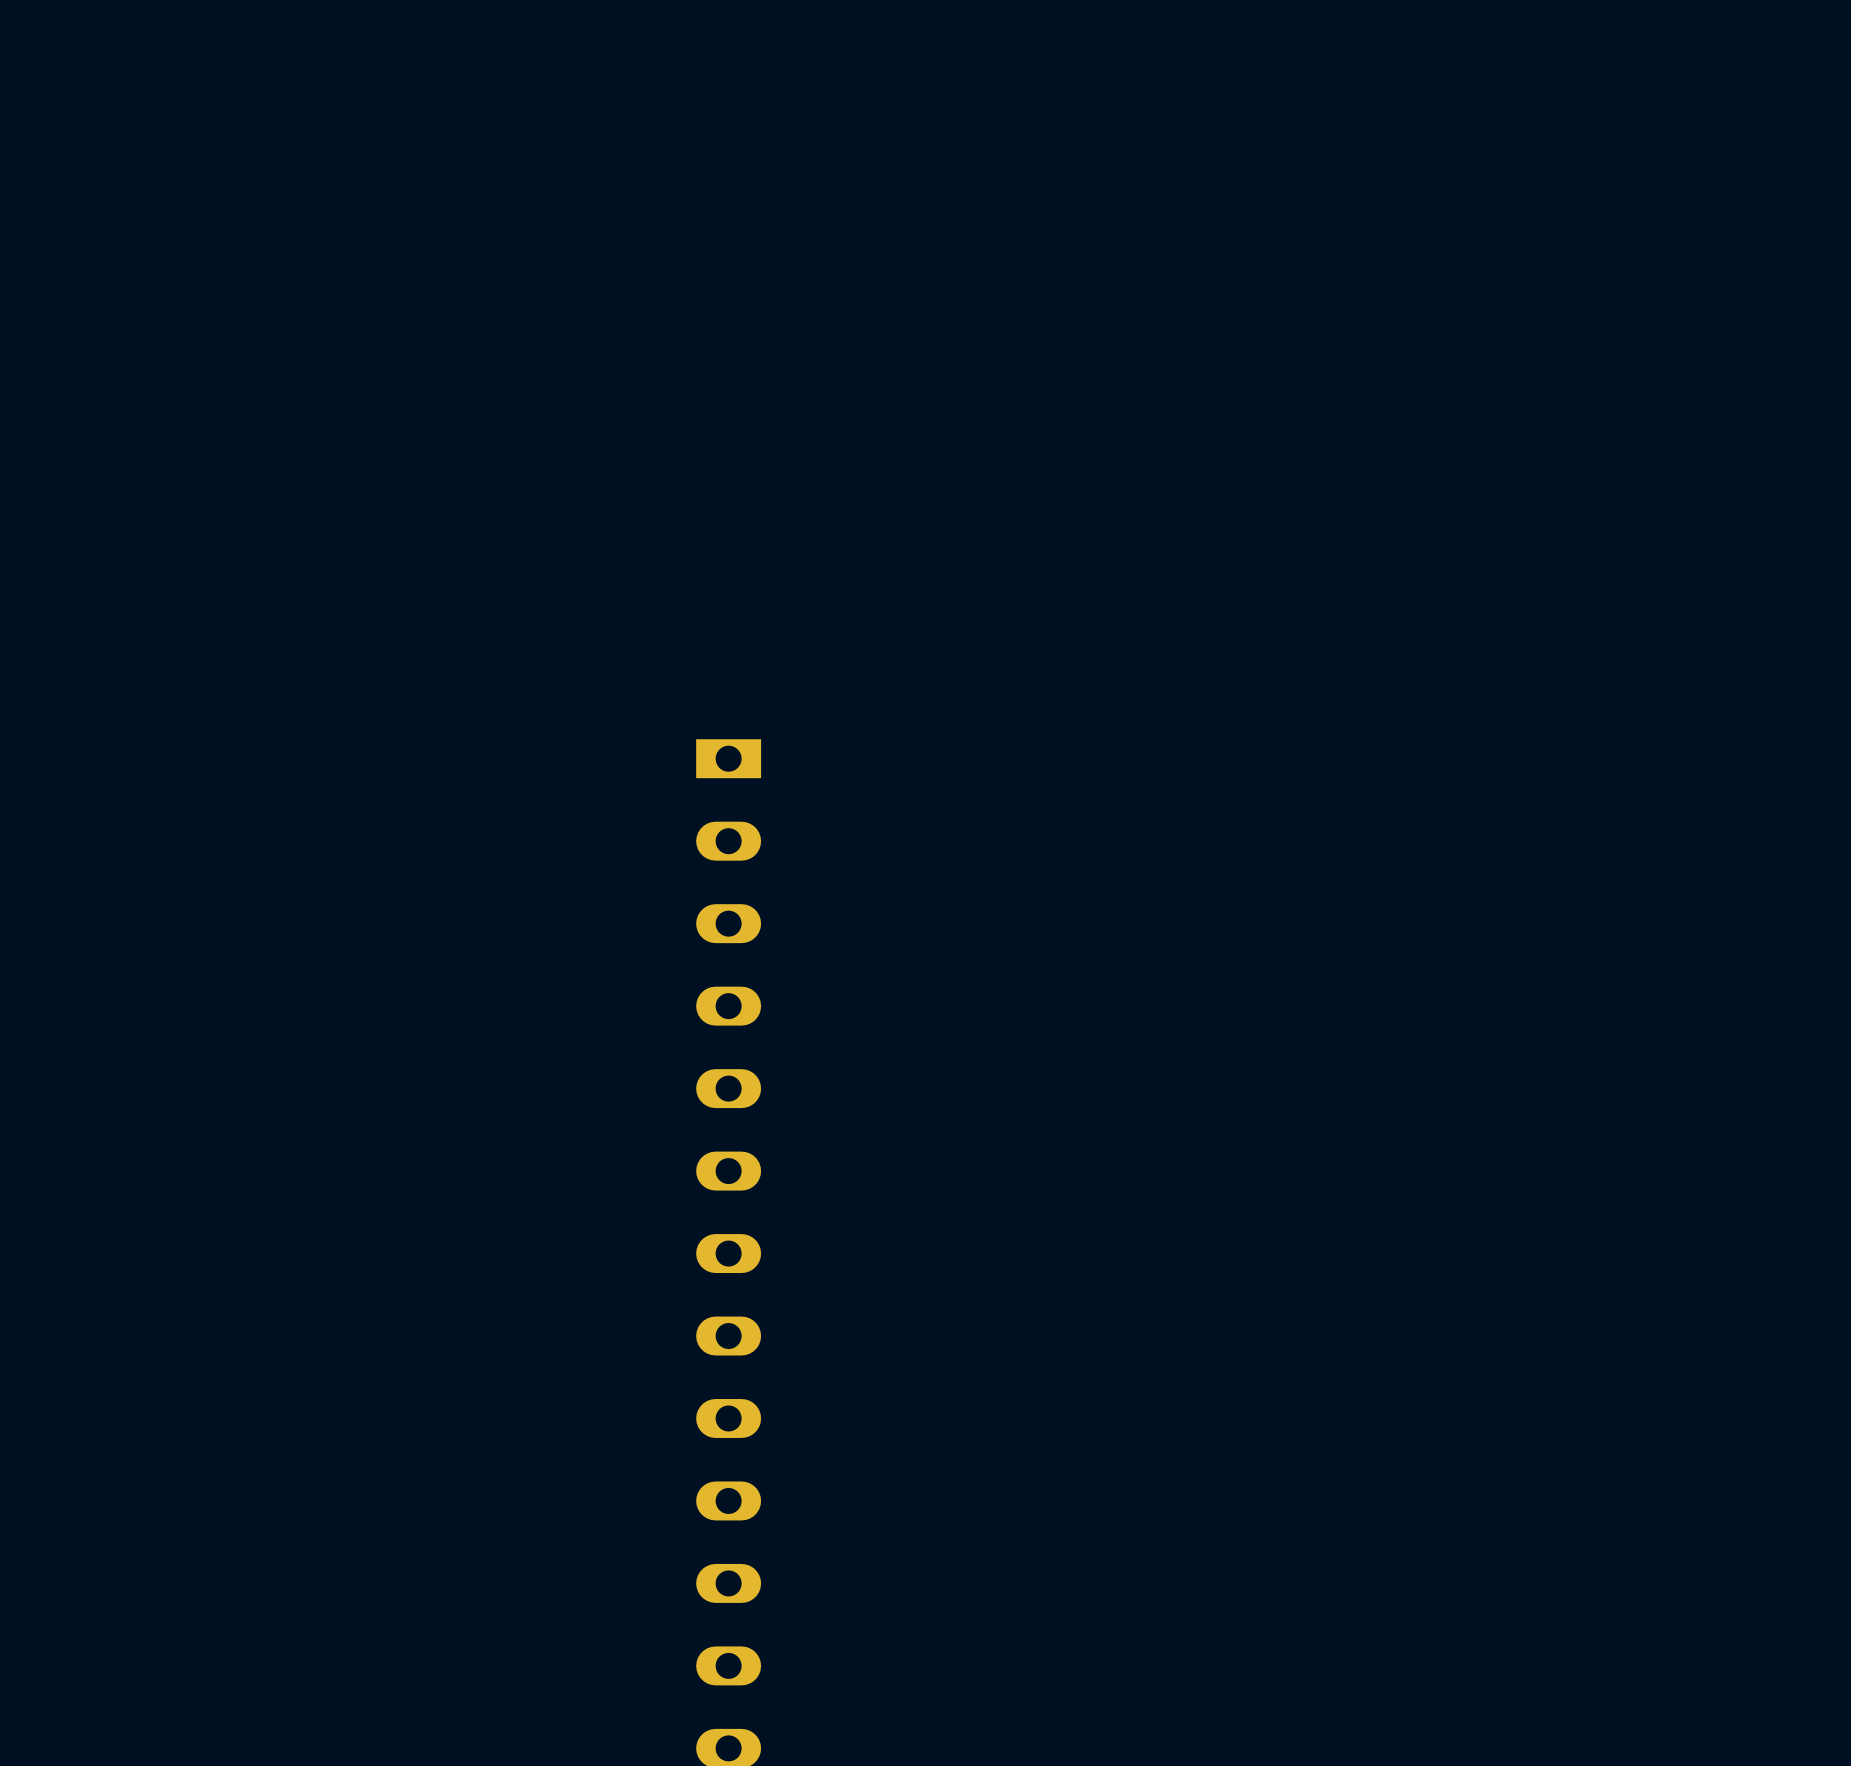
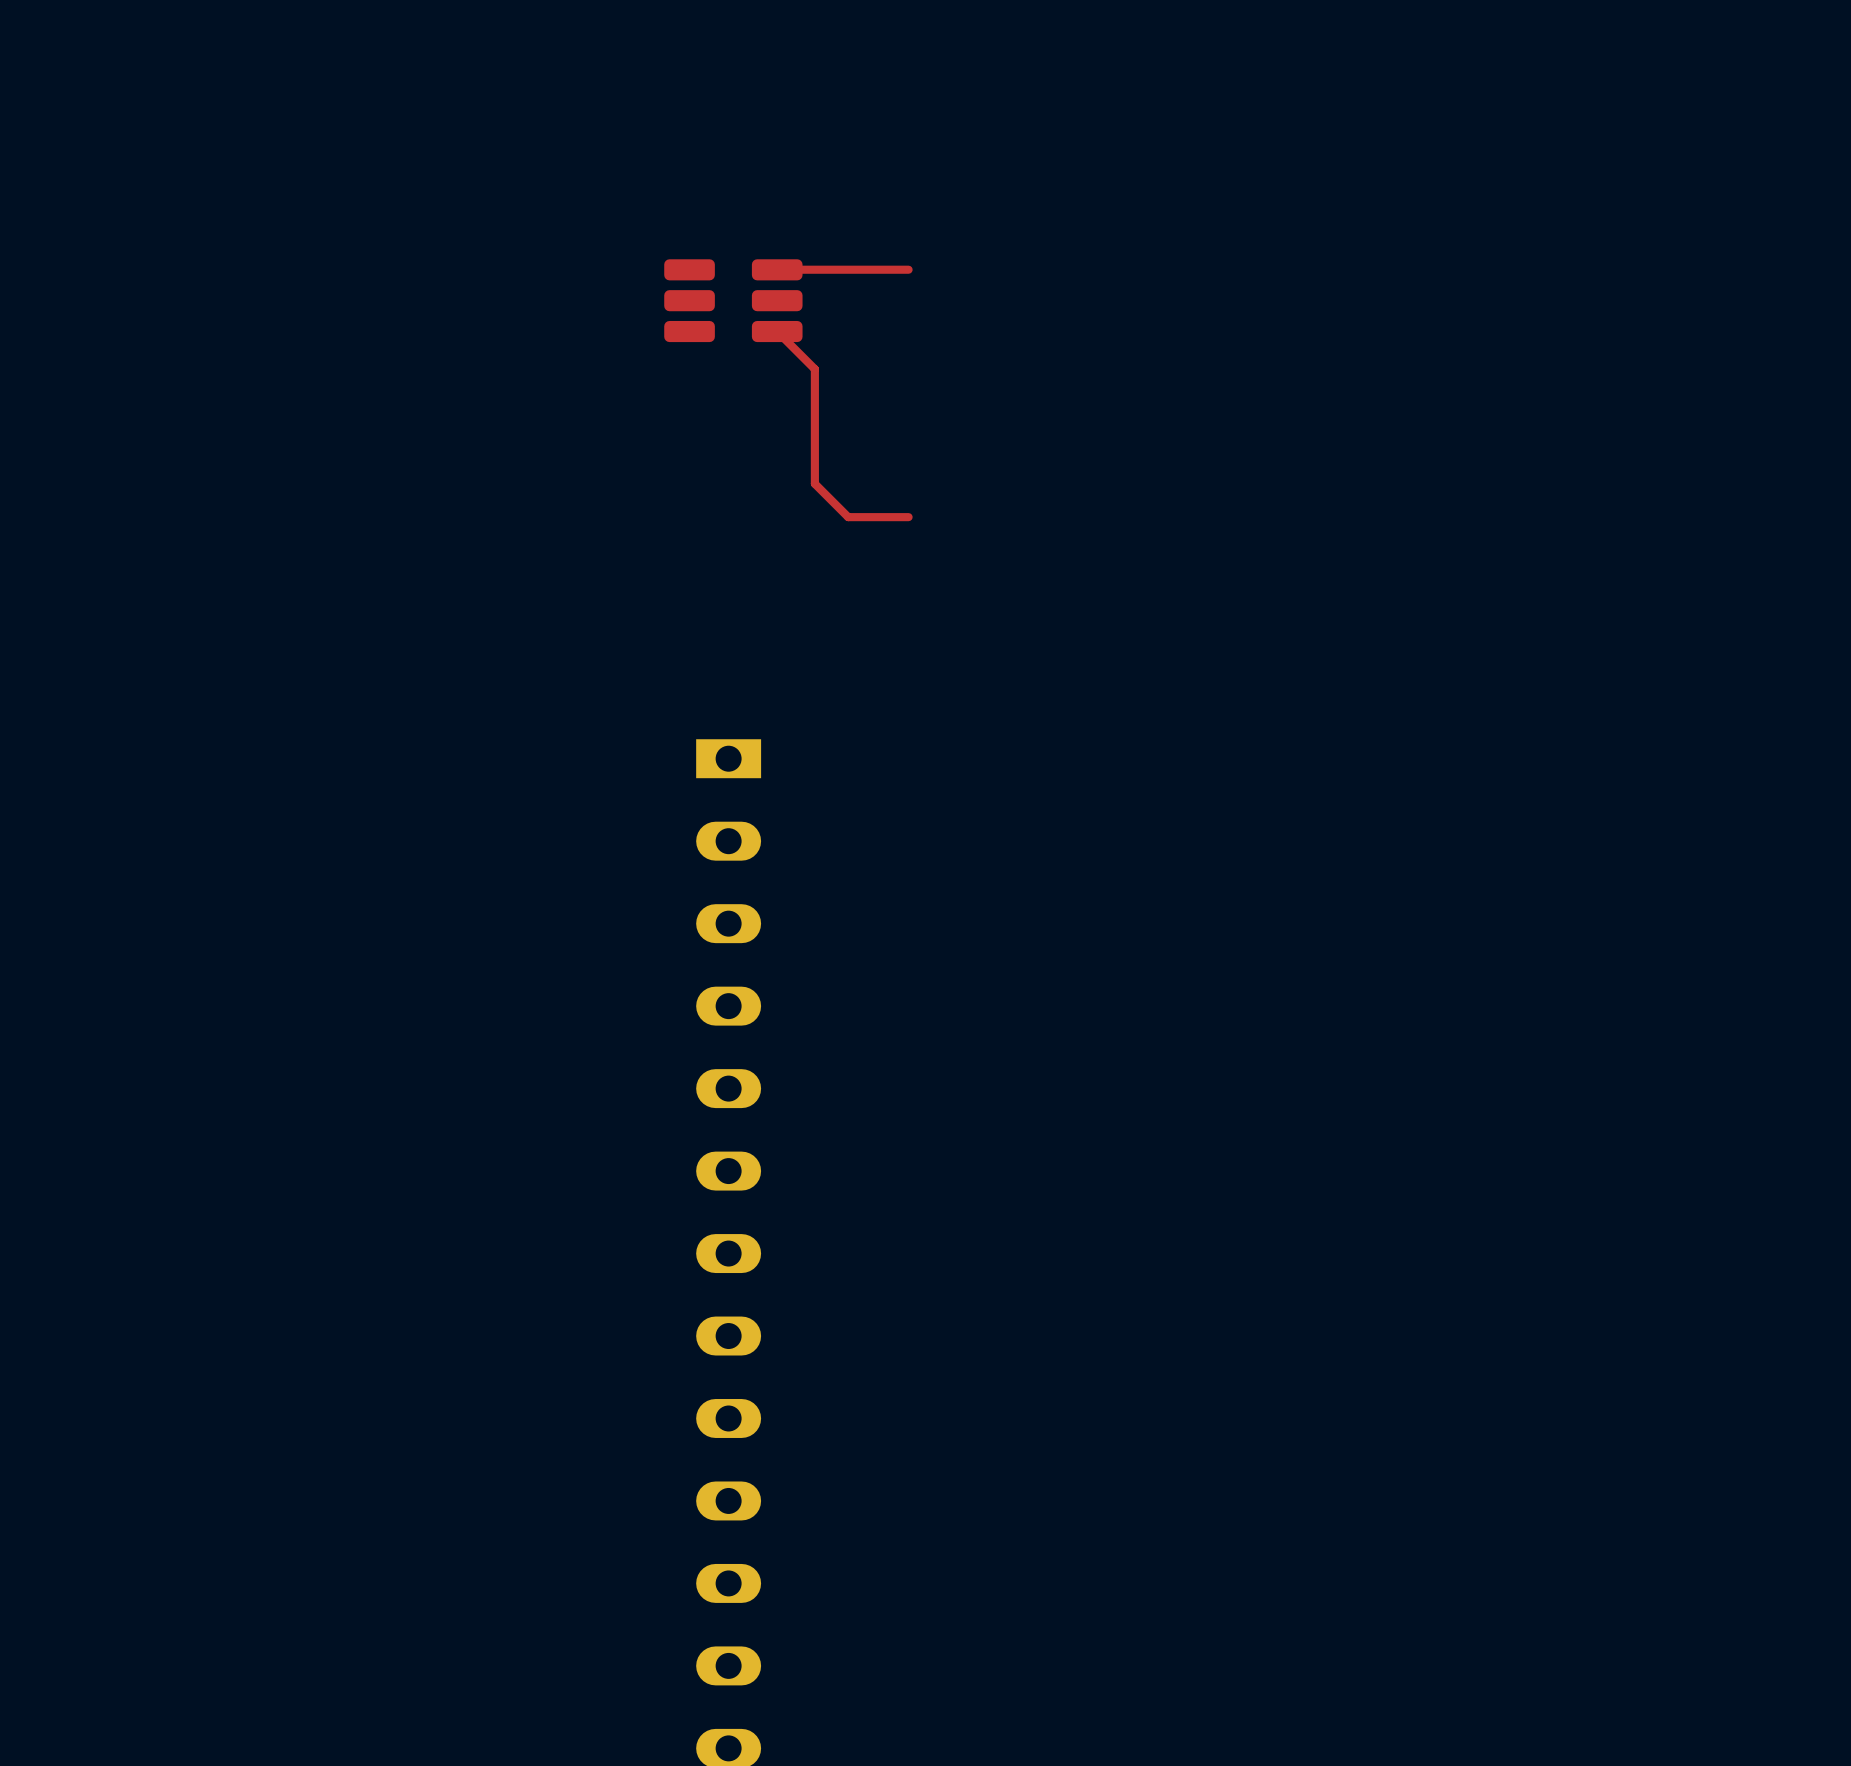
top track: none -> (908, 269) (777, 269)
part: none -> (733, 300)
top track: none -> (777, 331) (814, 369) (814, 483) (848, 517) (908, 517)

